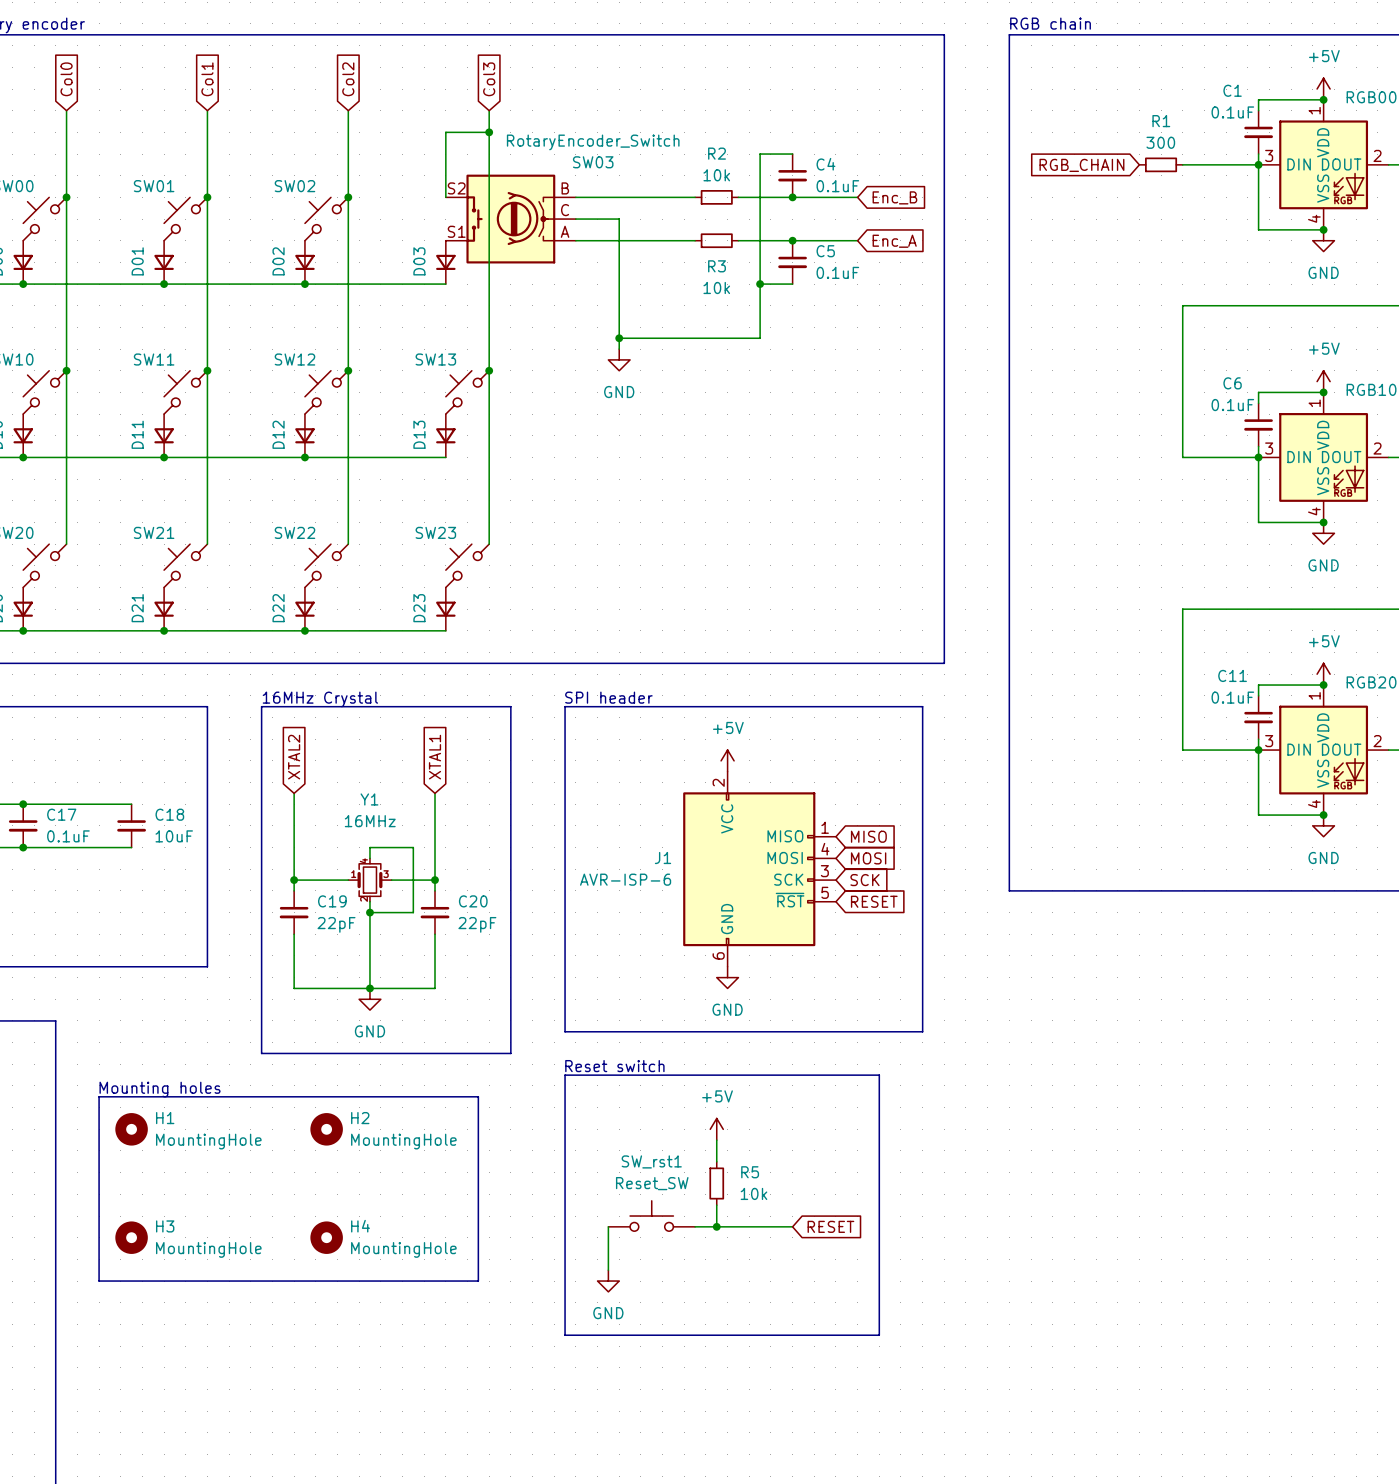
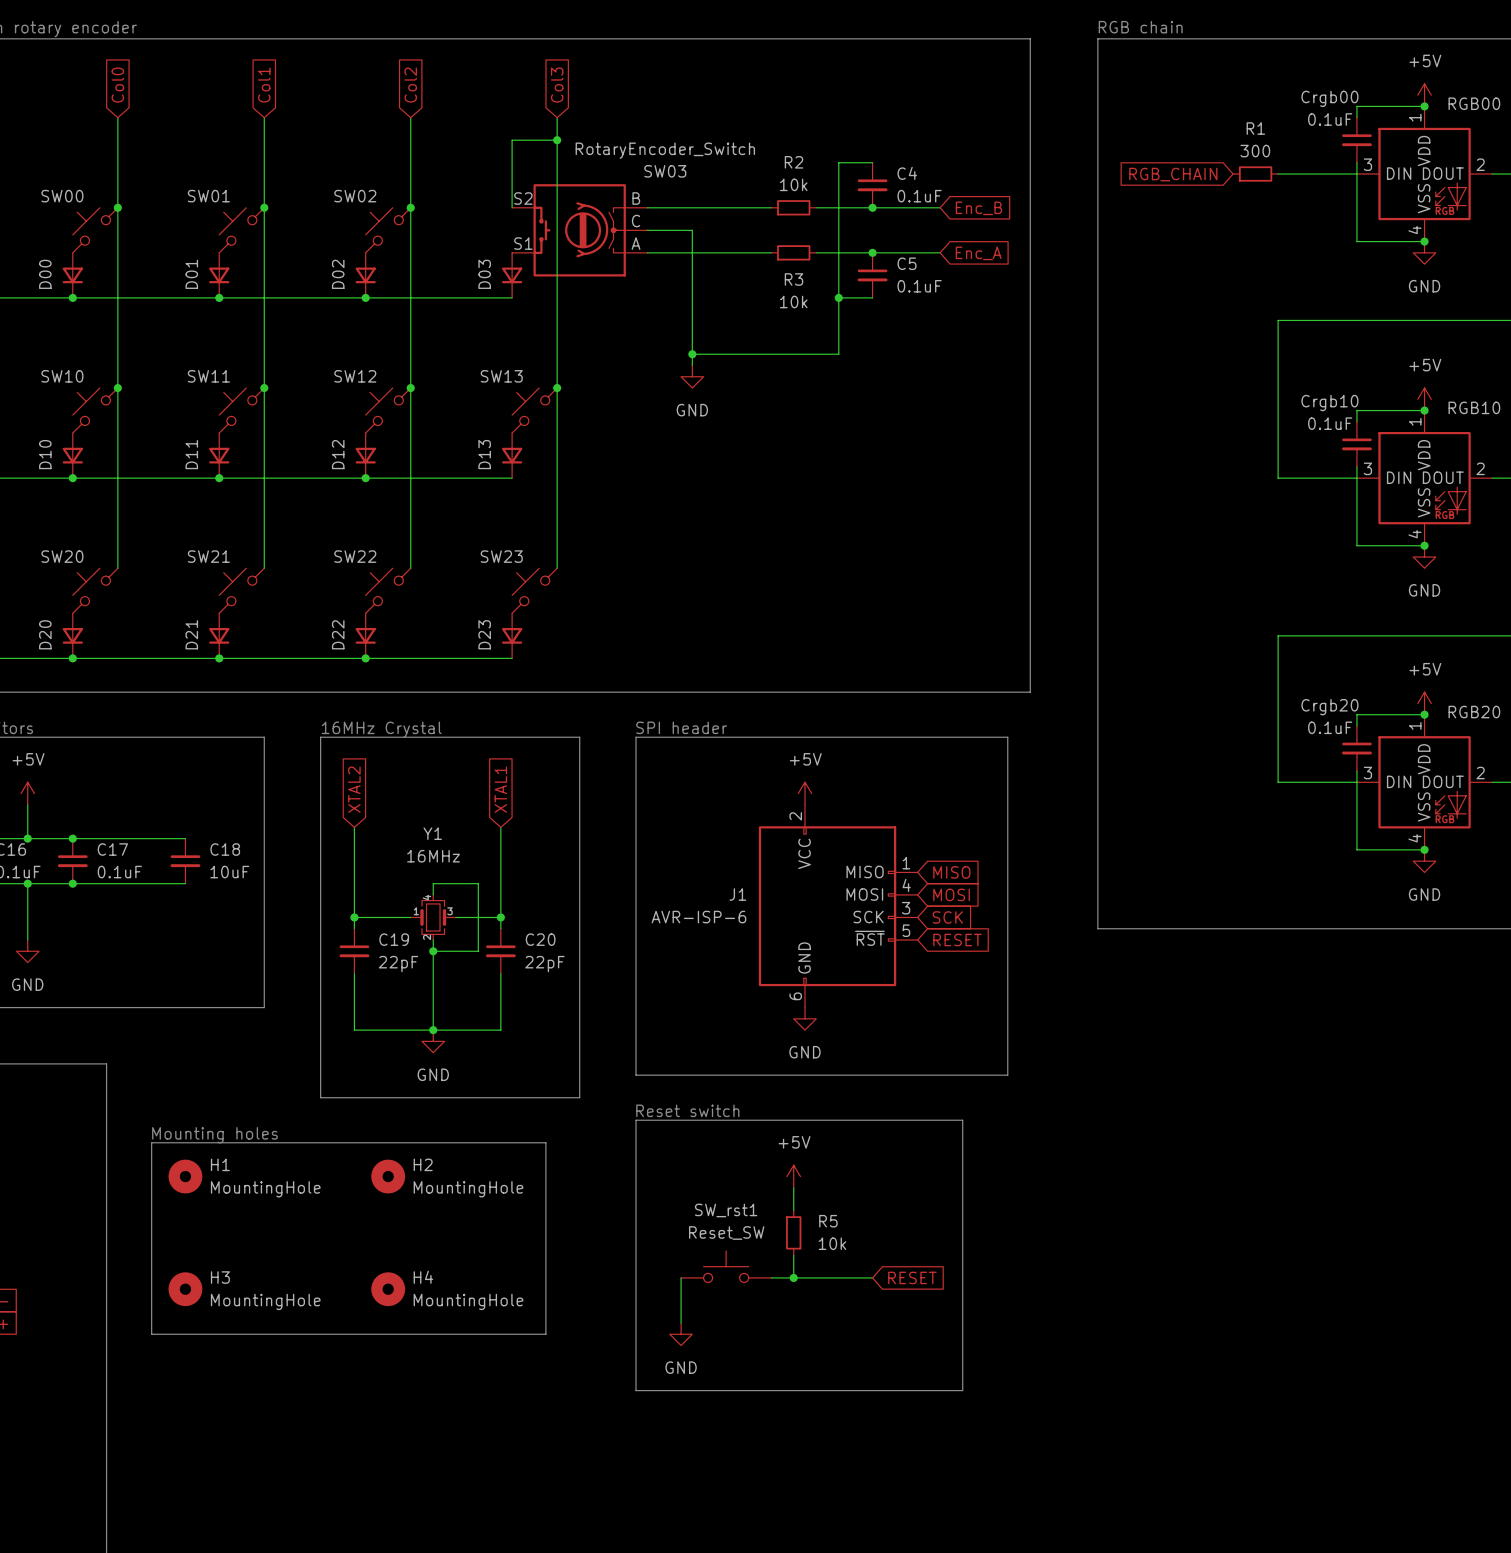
C1 name: C1 (1232, 90) -> Crgb00 (1329, 98)
junction: (1258, 164) -> none
C6 name: C6 (1232, 383) -> Crgb10 (1329, 403)
junction: (1258, 457) -> none
C11 name: C11 (1232, 675) -> Crgb20 (1329, 707)
junction: (1258, 750) -> none

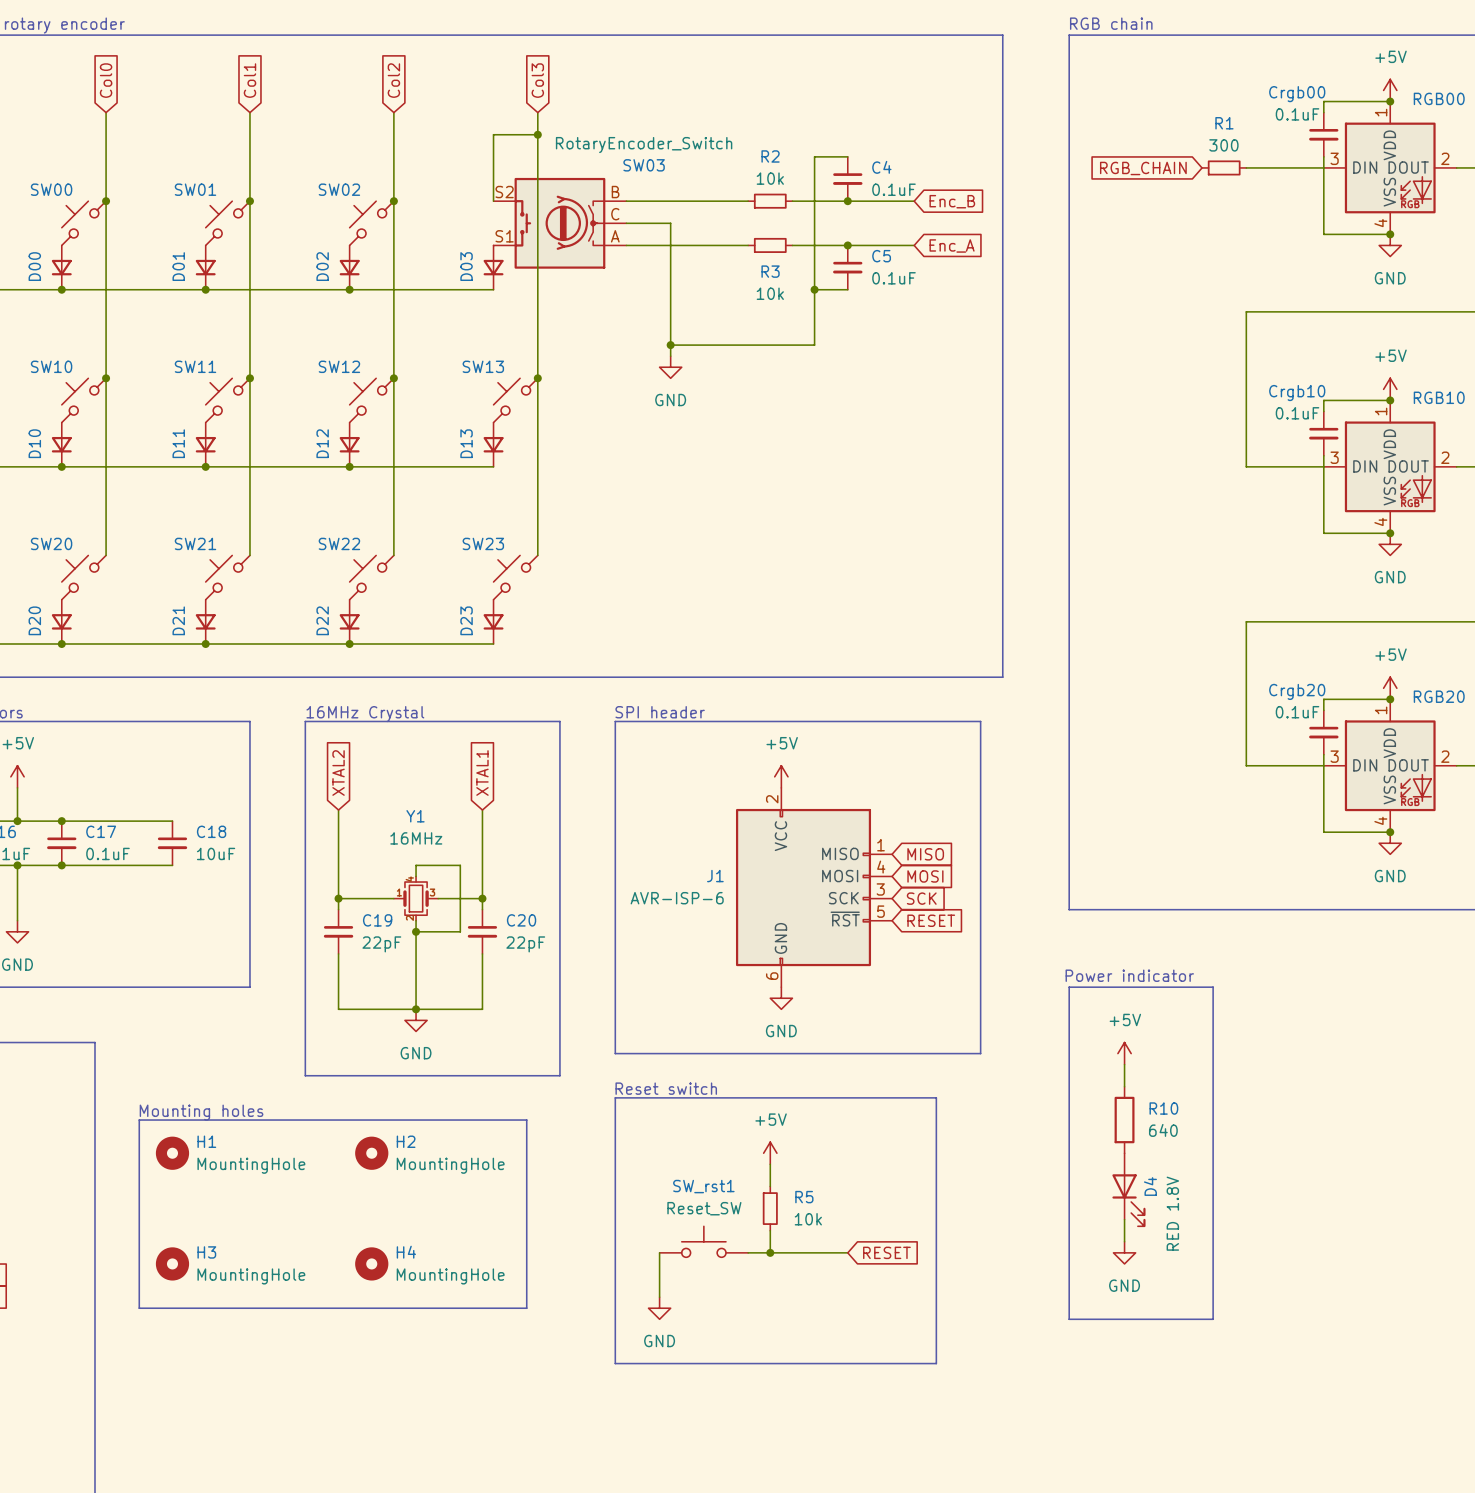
text: none -> Power indicator (1129, 975)
line: none -> (1069, 987) (1213, 987) (1213, 1319) (1069, 1319) (1069, 987)
power symbol: none -> +5V (1124, 1053)
wire: none -> (1124, 1064) (1124, 1086)
R10: none -> 640 (1124, 1120)
D4: none -> RED 1.8V (1128, 1189)
wire: none -> (1124, 1219) (1124, 1241)
power symbol: none -> GND (1124, 1252)

